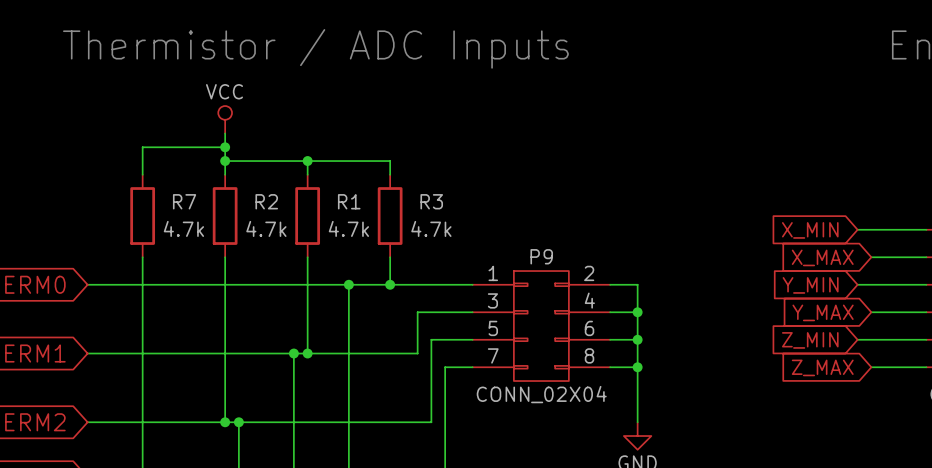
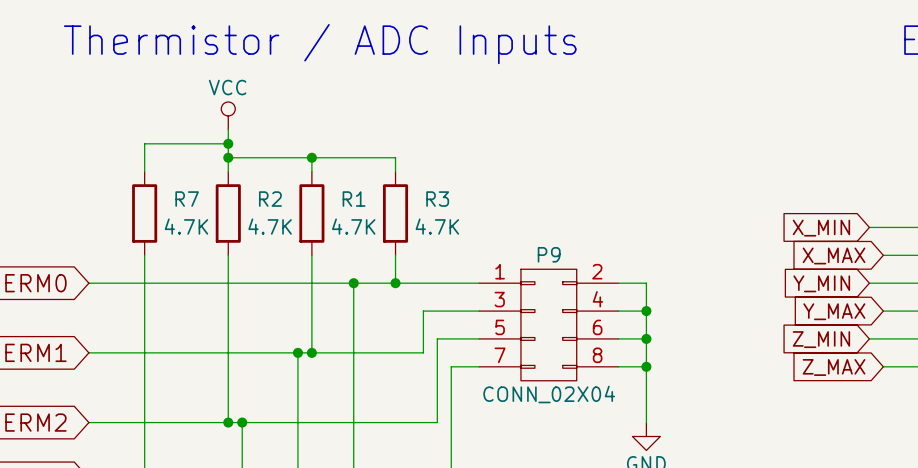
R7 value: 4.7k (183, 228) -> 4.7K (186, 226)
R2 value: 4.7k (266, 228) -> 4.7K (270, 226)
R1 value: 4.7k (348, 228) -> 4.7K (353, 226)
R3 value: 4.7k (431, 228) -> 4.7K (437, 226)

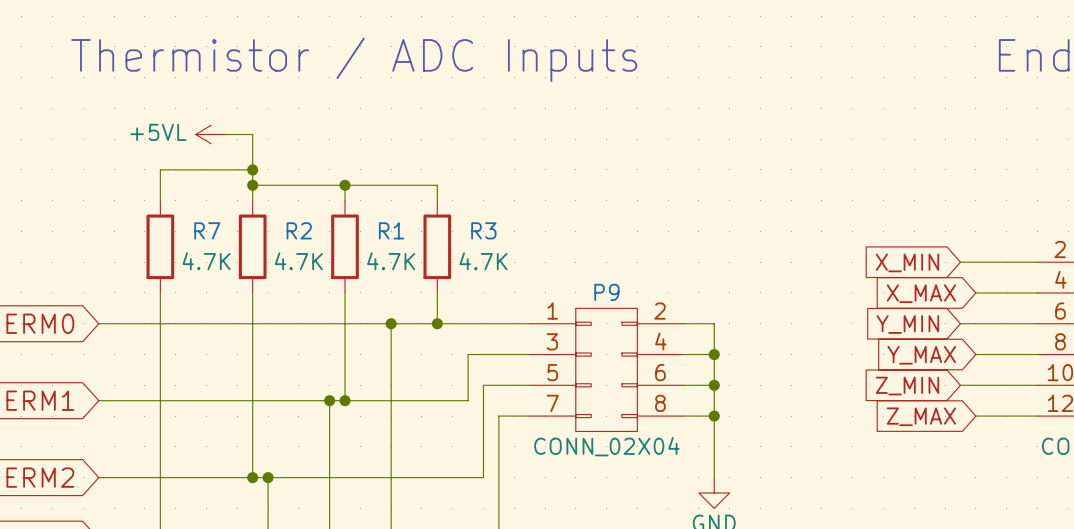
power symbol: none -> +5VL (211, 134)
wire: none -> (226, 134) (252, 134) (252, 154)
power symbol: VCC (228, 115) -> none

